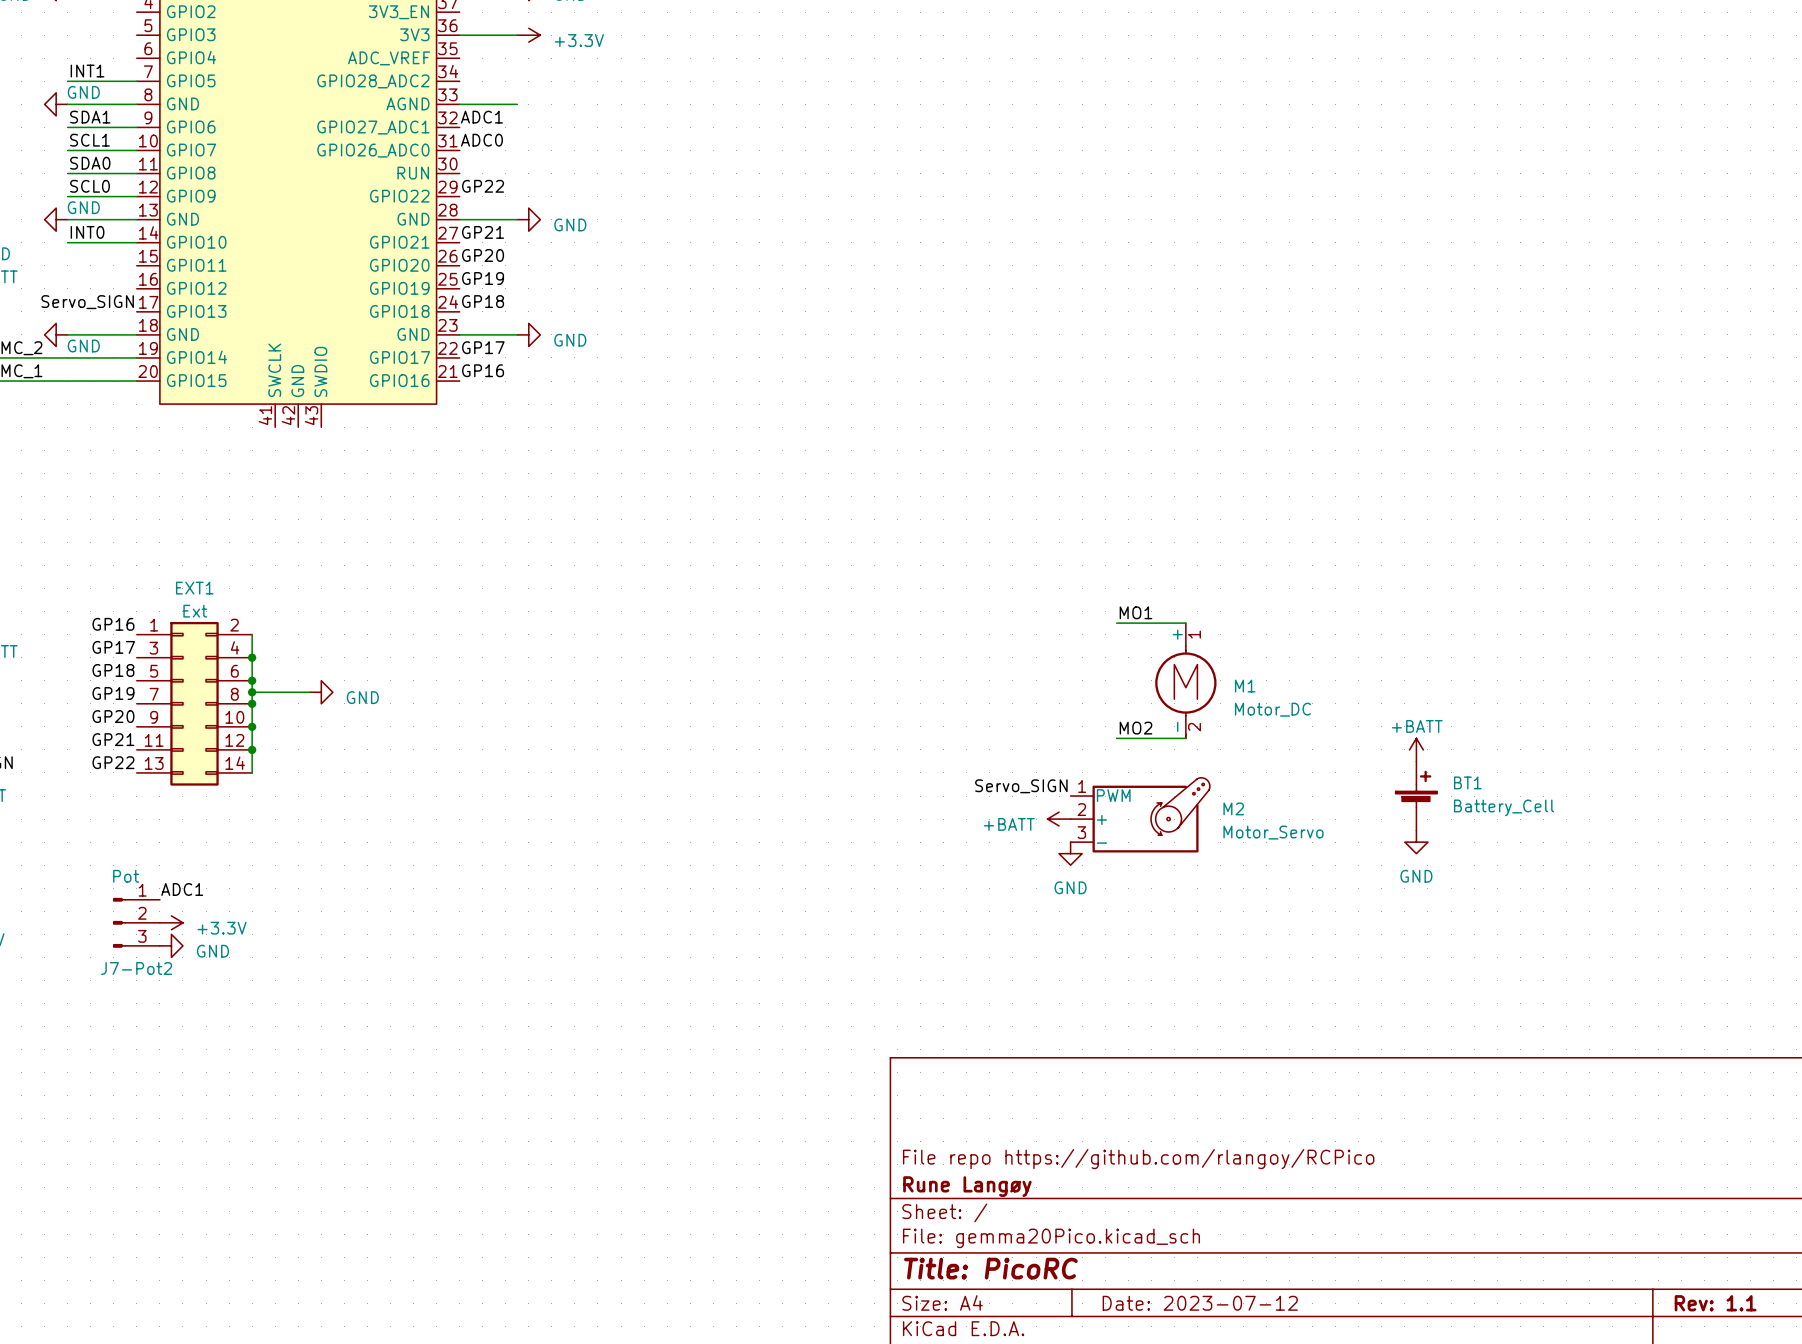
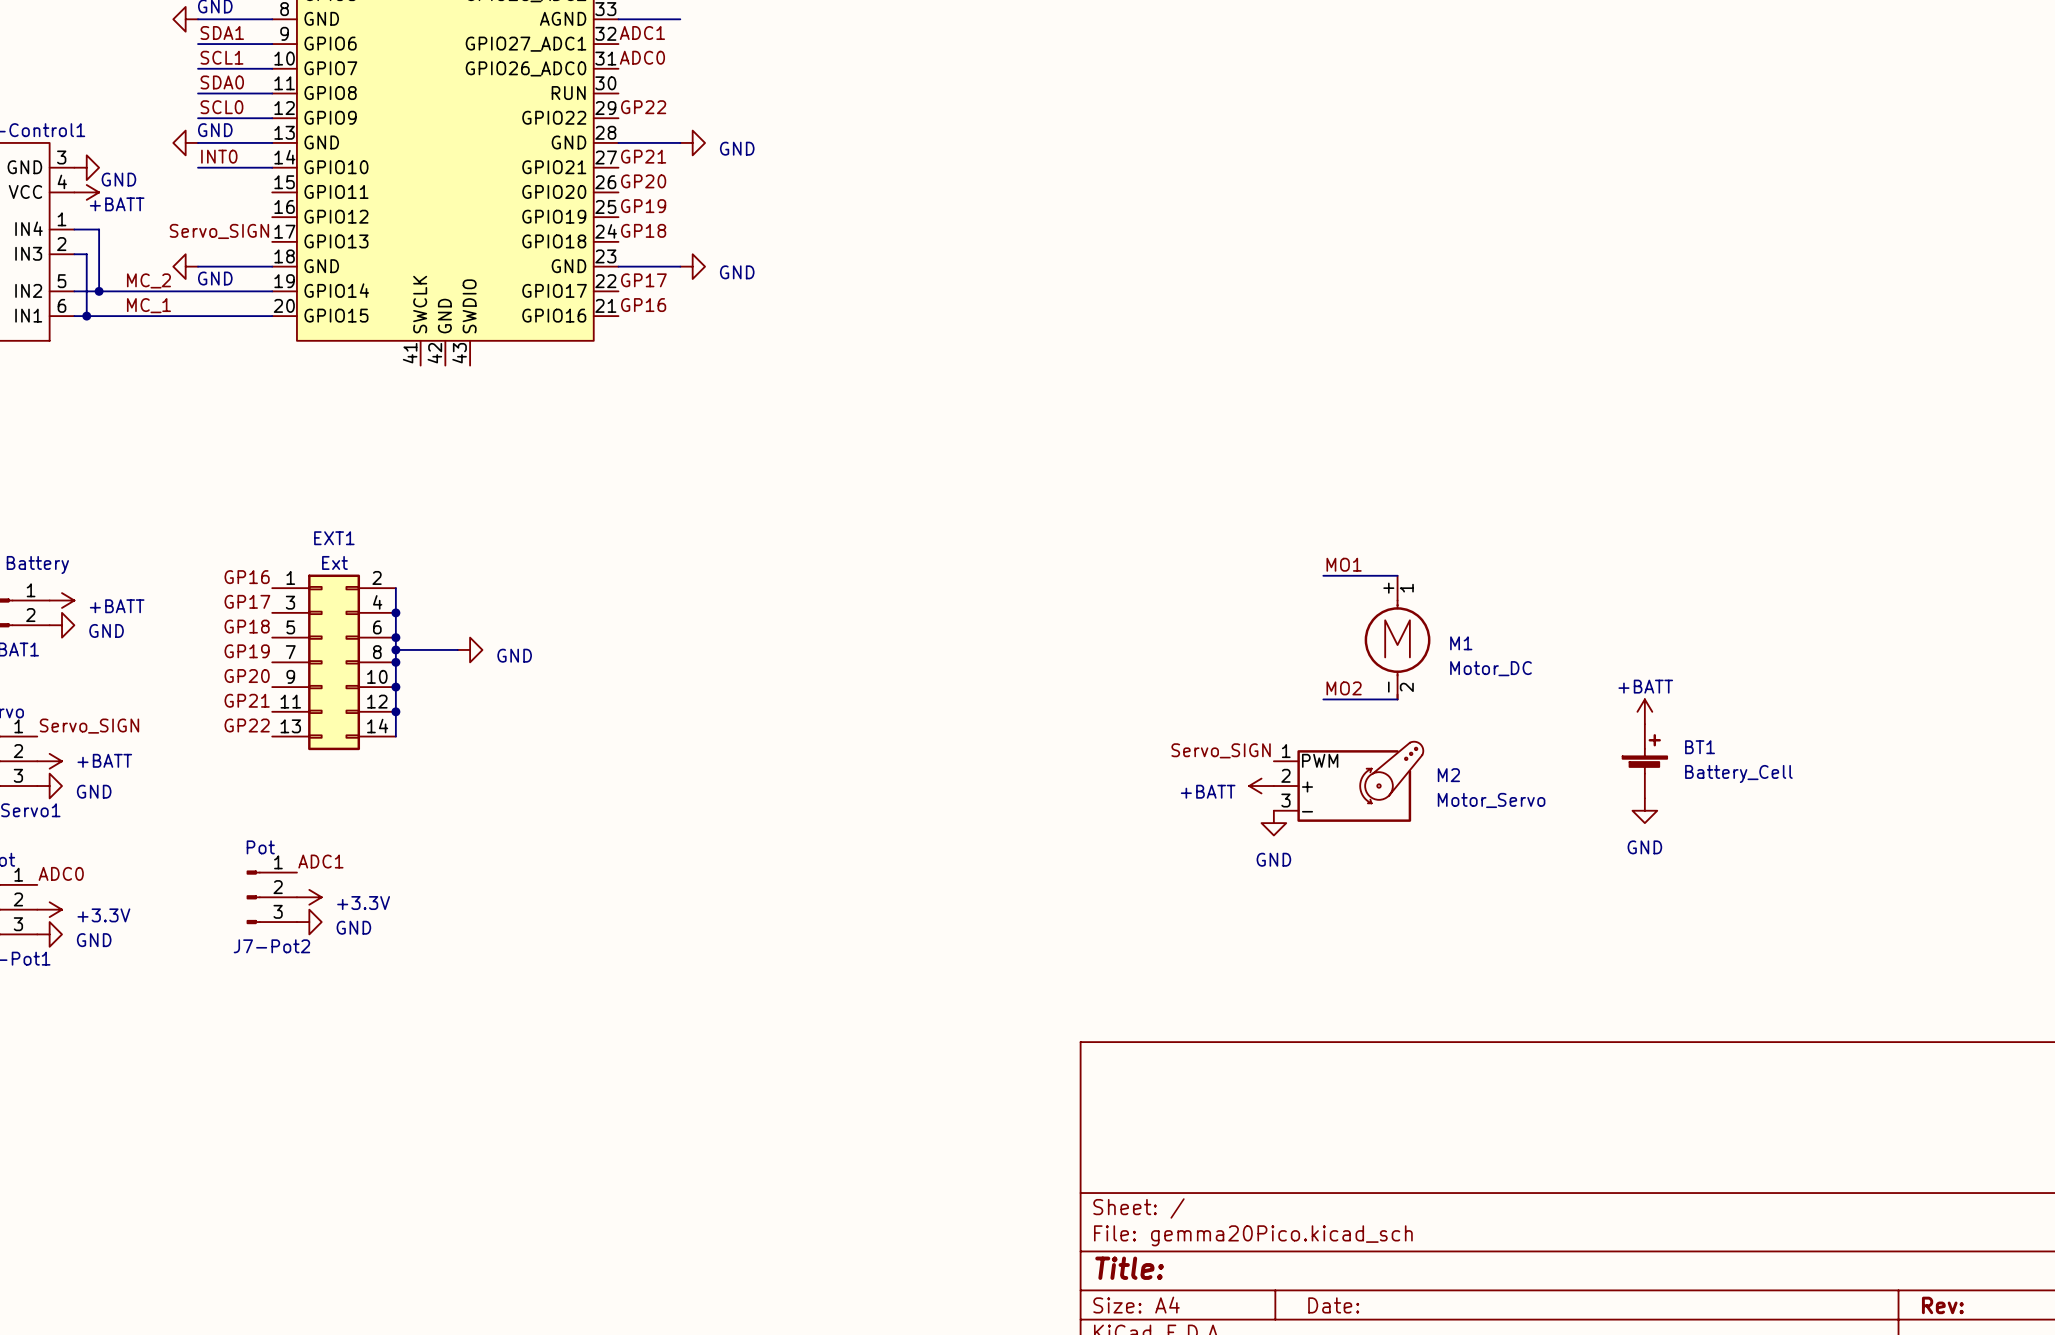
title block: File repo https://github.com/rlangoy/RCPico (1138, 1159) -> none
title block: Rune Langøy (967, 1186) -> none
title block: Title: PicoRC (990, 1268) -> Title: (1129, 1268)
title block: Date: 2023-07-12 (1200, 1303) -> Date: (1333, 1305)
title block: Rev: 1.1 (1715, 1303) -> Rev: (1942, 1305)

